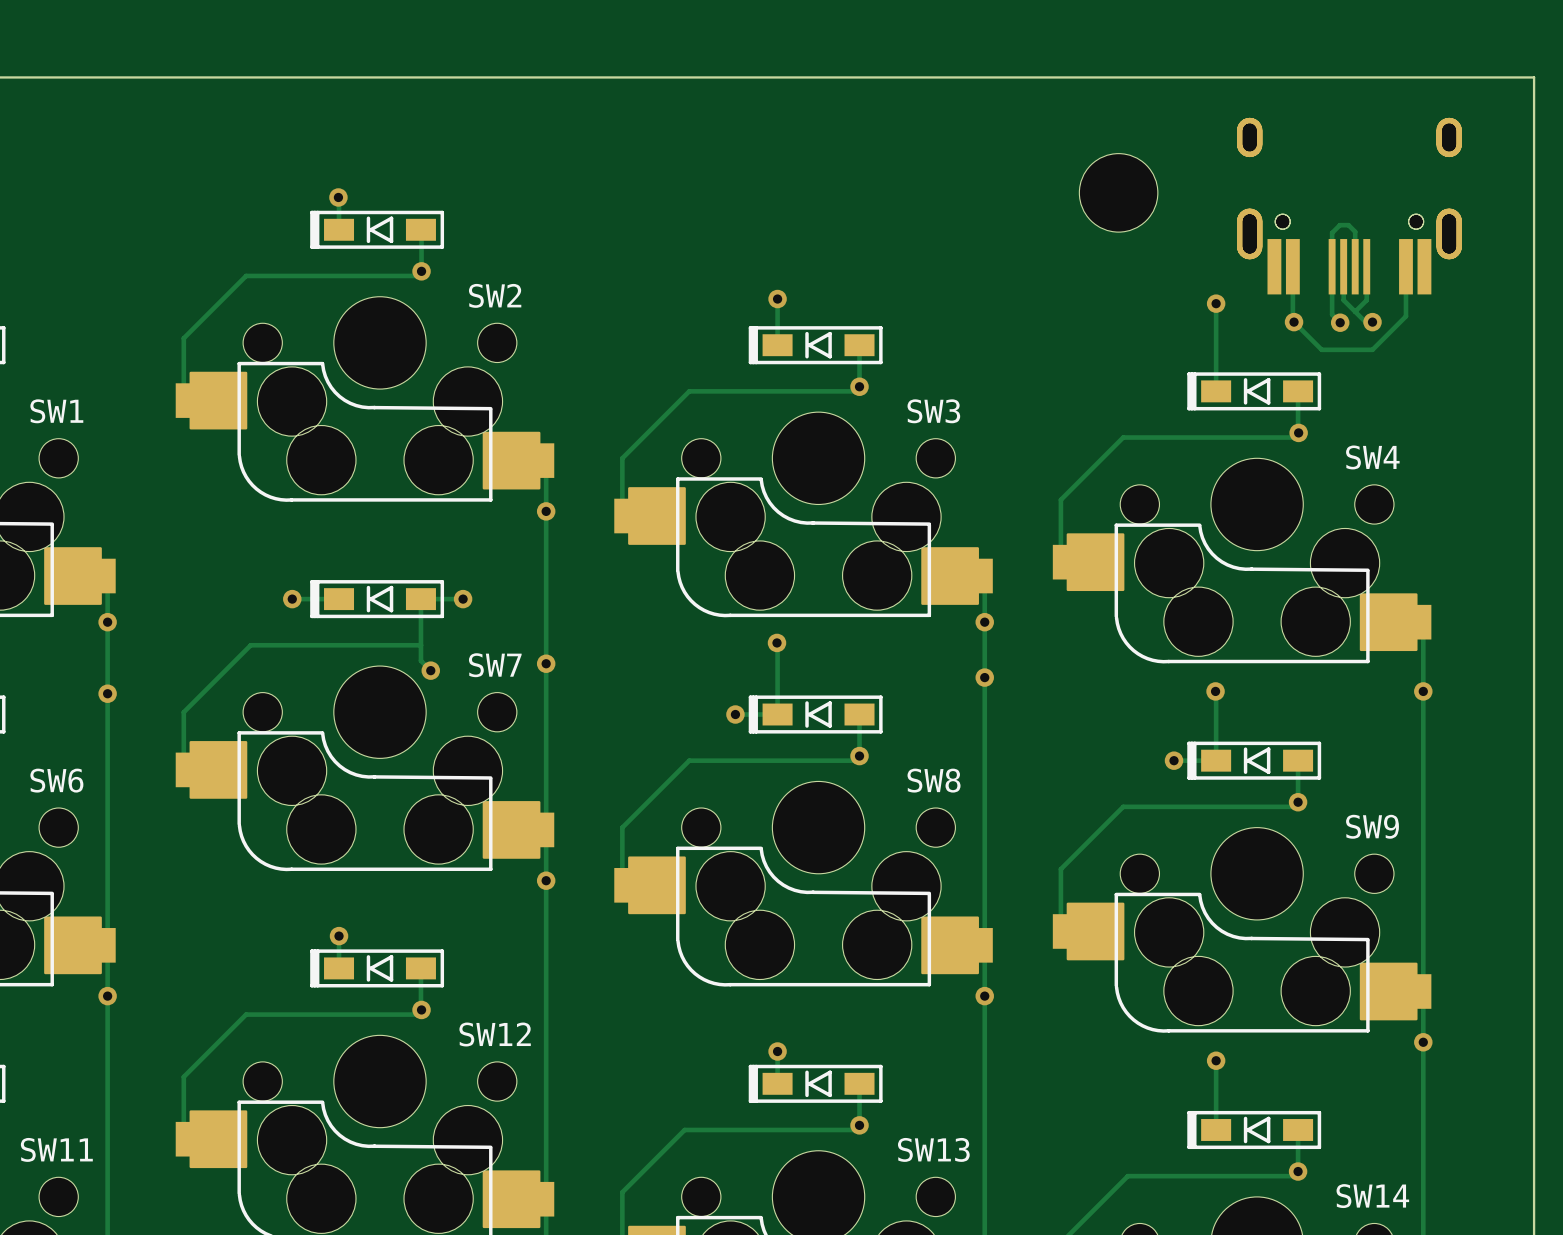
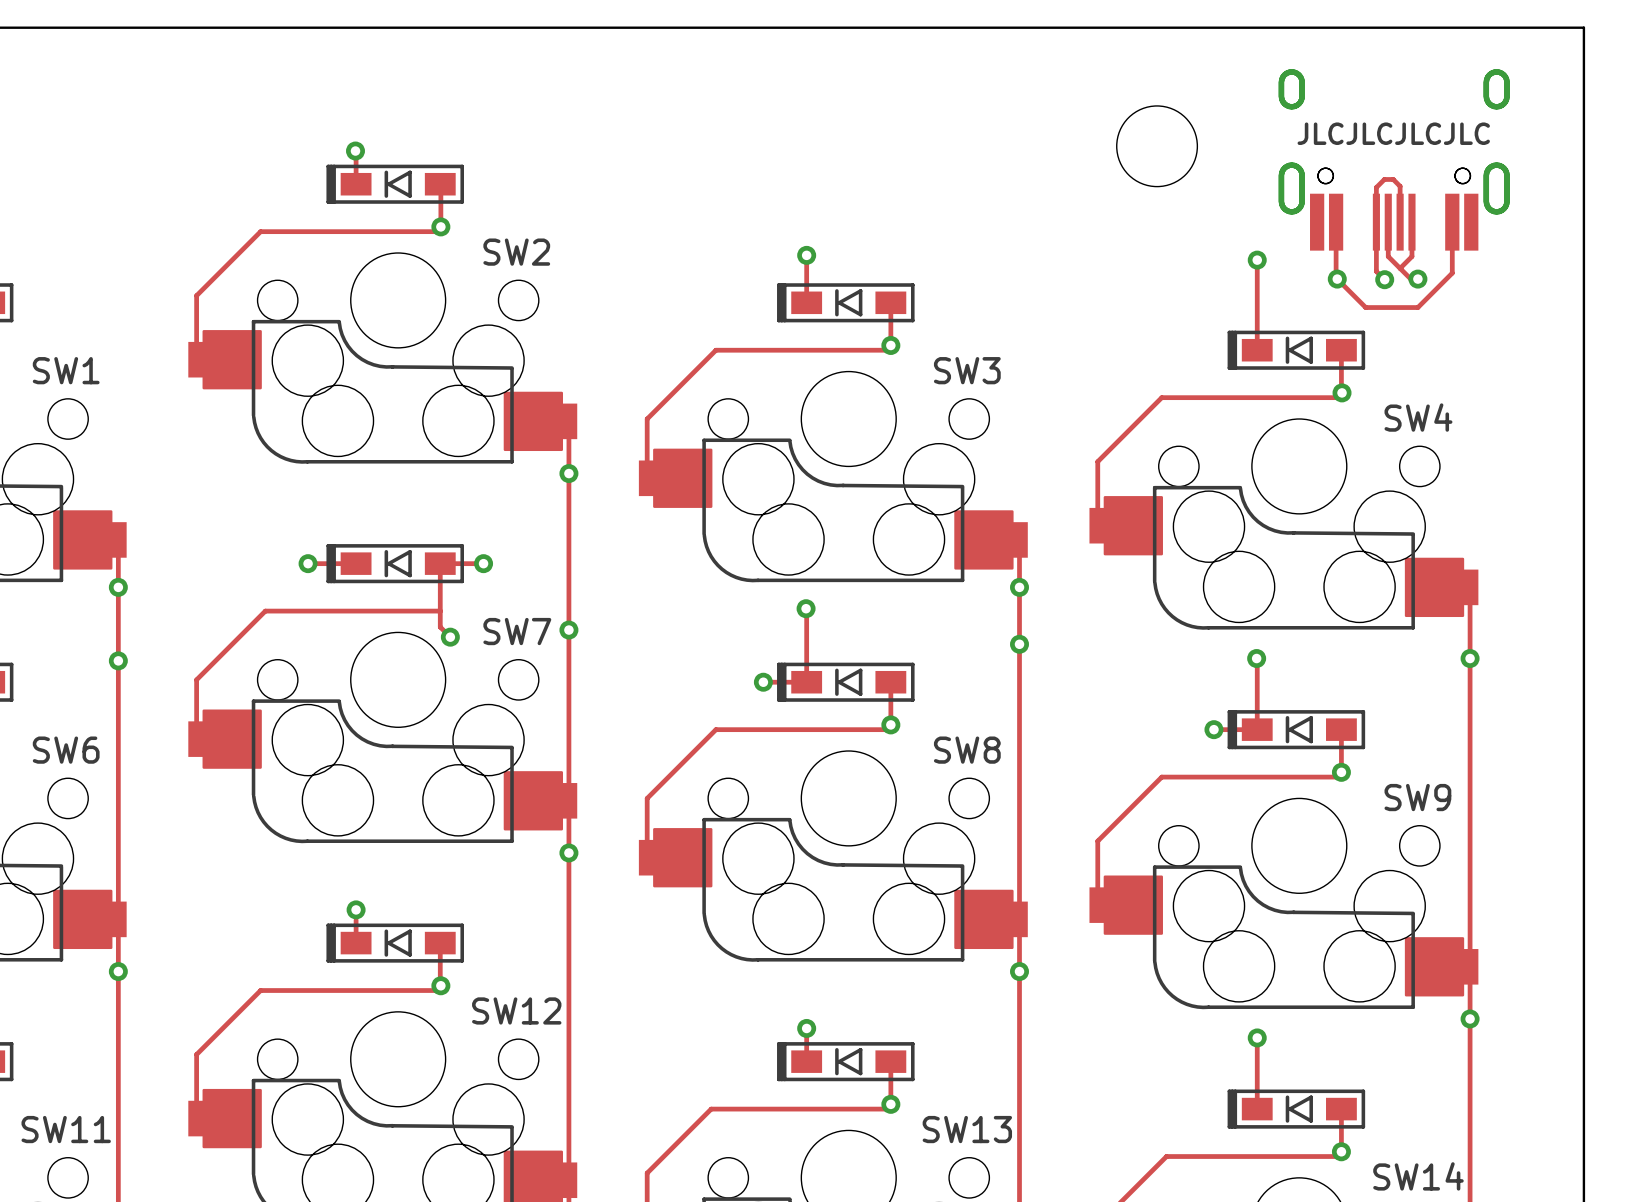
text: none -> JLCJLCJLCJLC (1393, 133)

